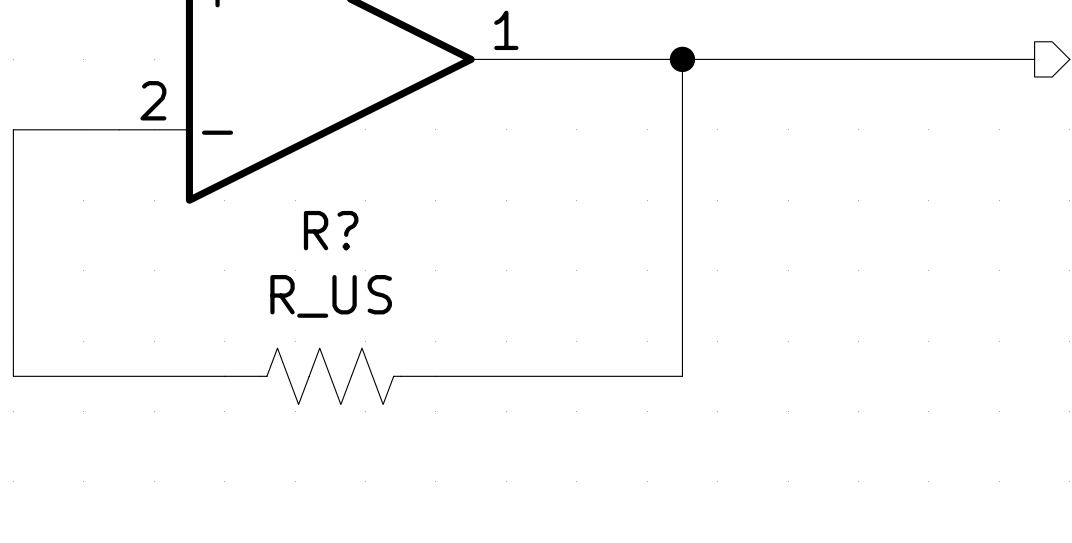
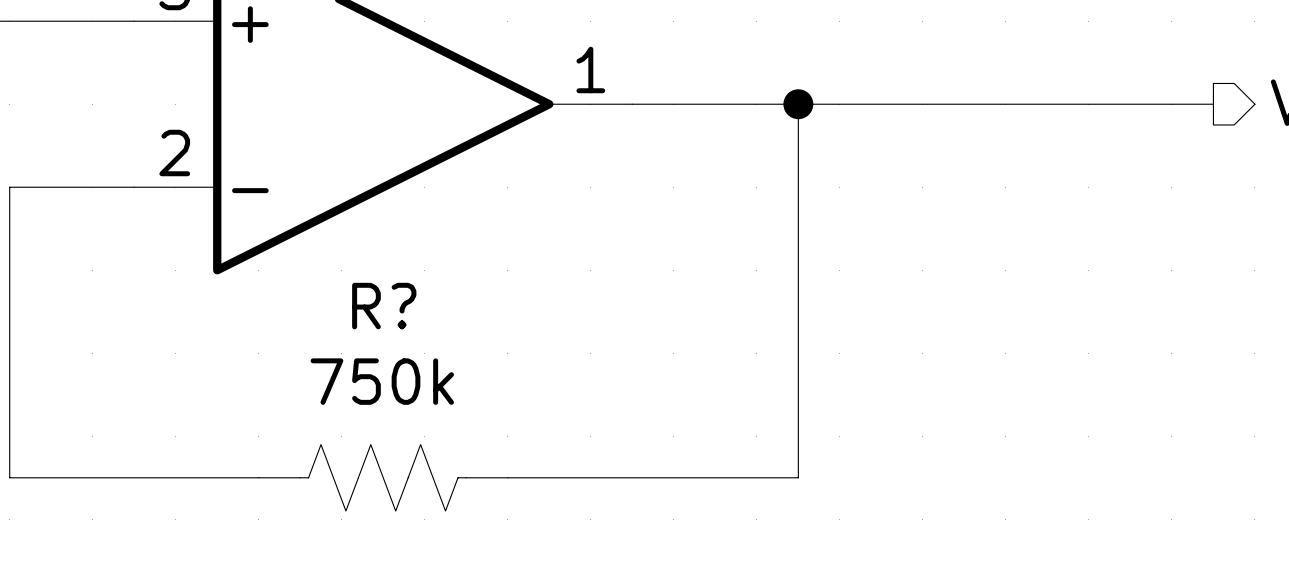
R? value: R_US (331, 296) -> 750k (382, 381)

